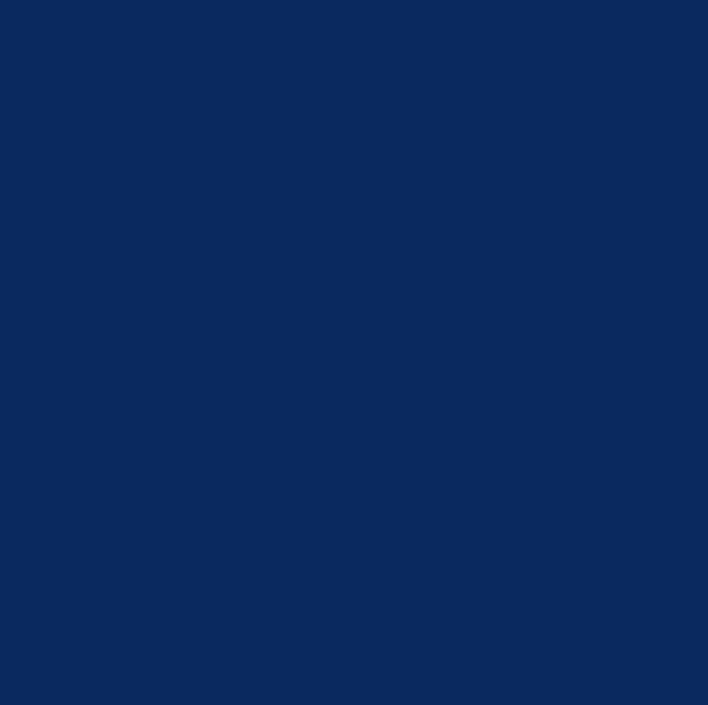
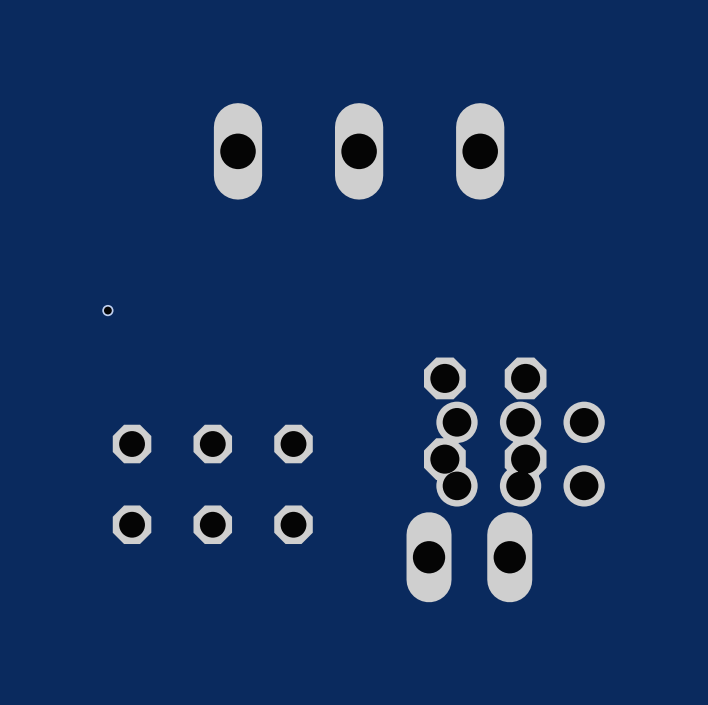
part: none -> (359, 151)
hole: none -> (107, 310)
part: none -> (485, 418)
part: none -> (520, 454)
part: none -> (212, 484)
part: none -> (469, 557)

